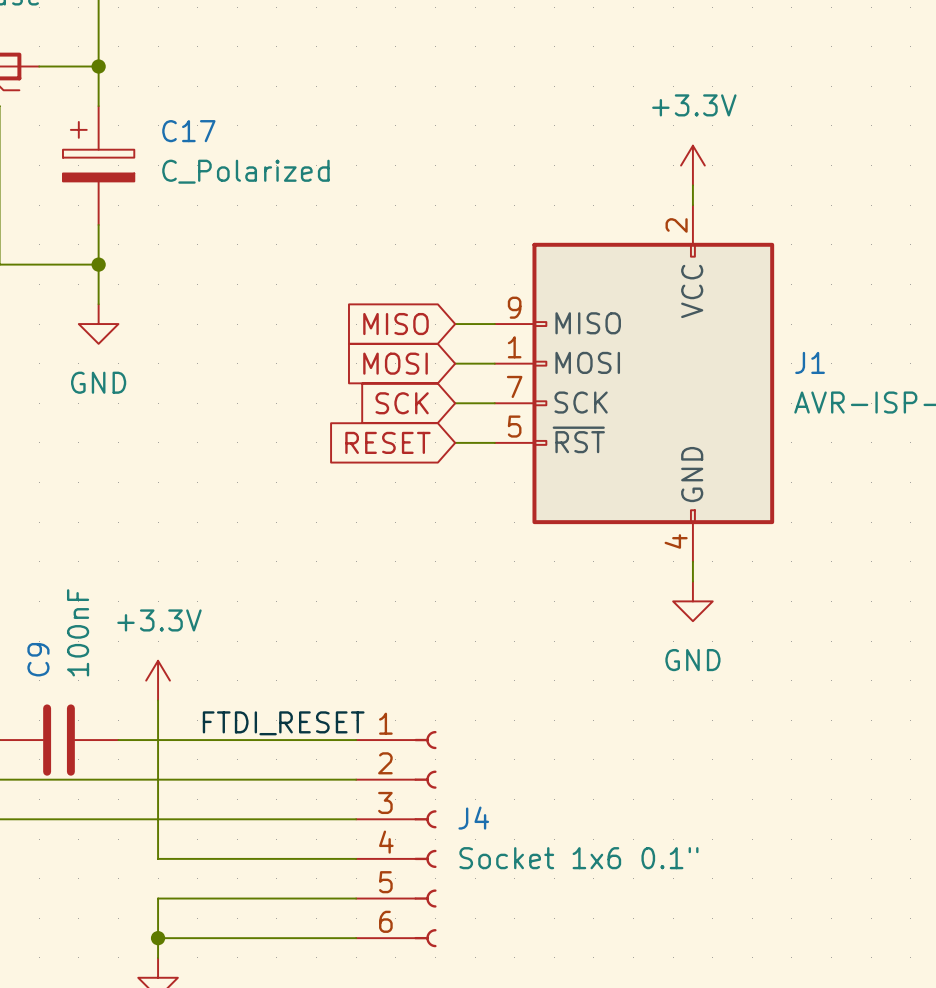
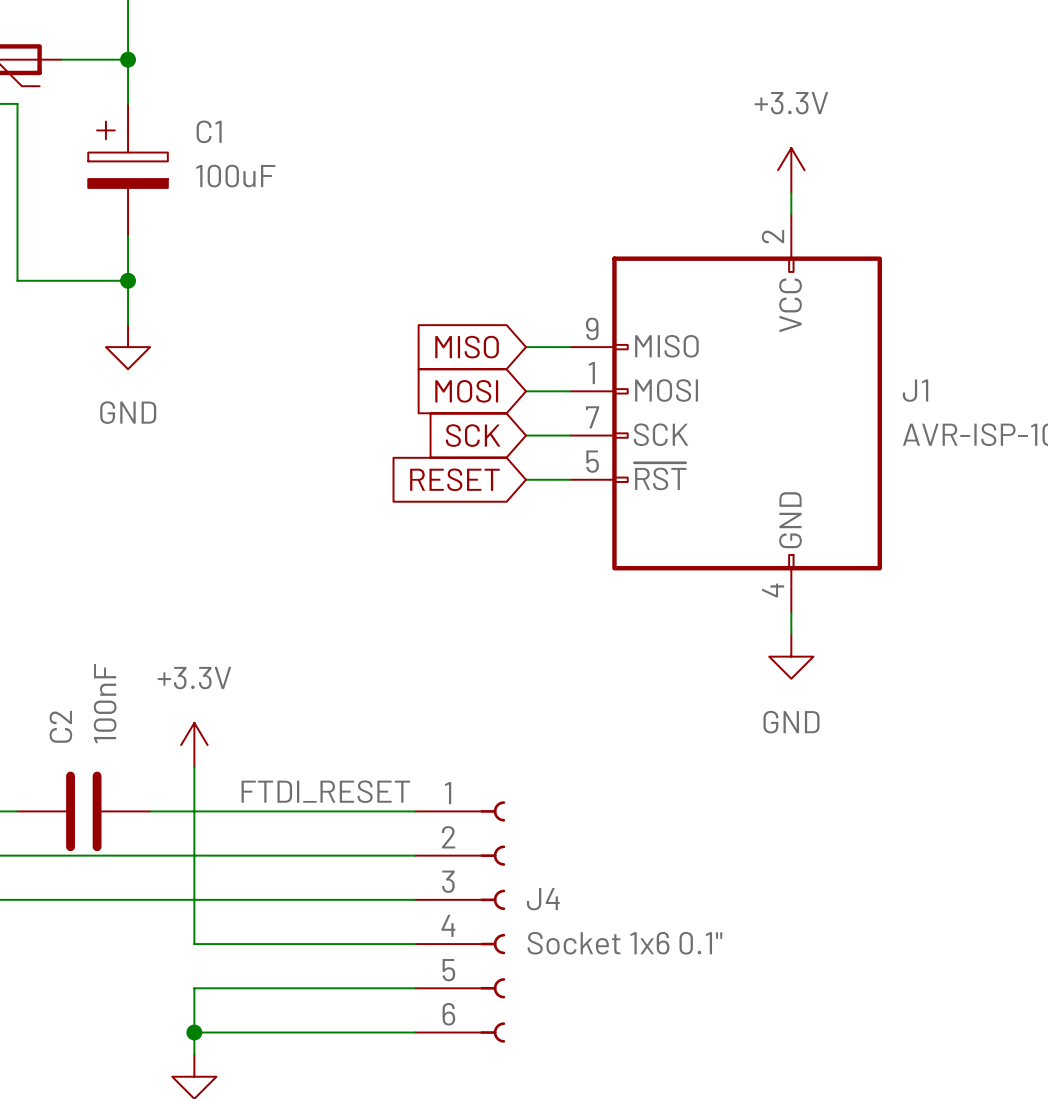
C17 name: C17 (188, 131) -> C1 (209, 131)
C17 value: C_Polarized (245, 171) -> 100uF (235, 176)
C9 name: C9 (38, 659) -> C2 (60, 726)

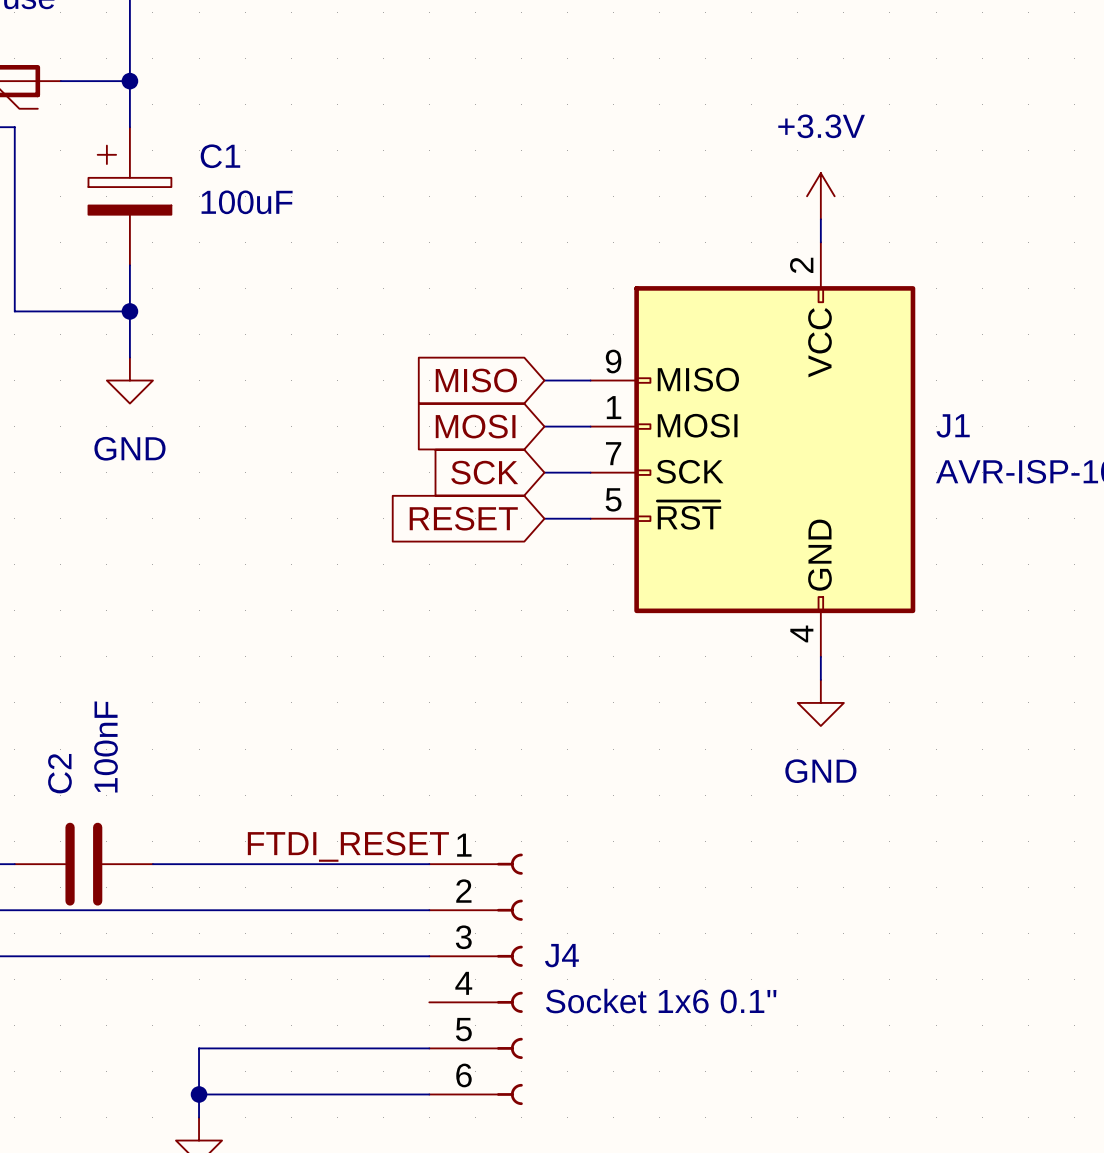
power symbol: +3.3V (194, 745) -> none
wire: (194, 767) (194, 944) (415, 944) -> none

